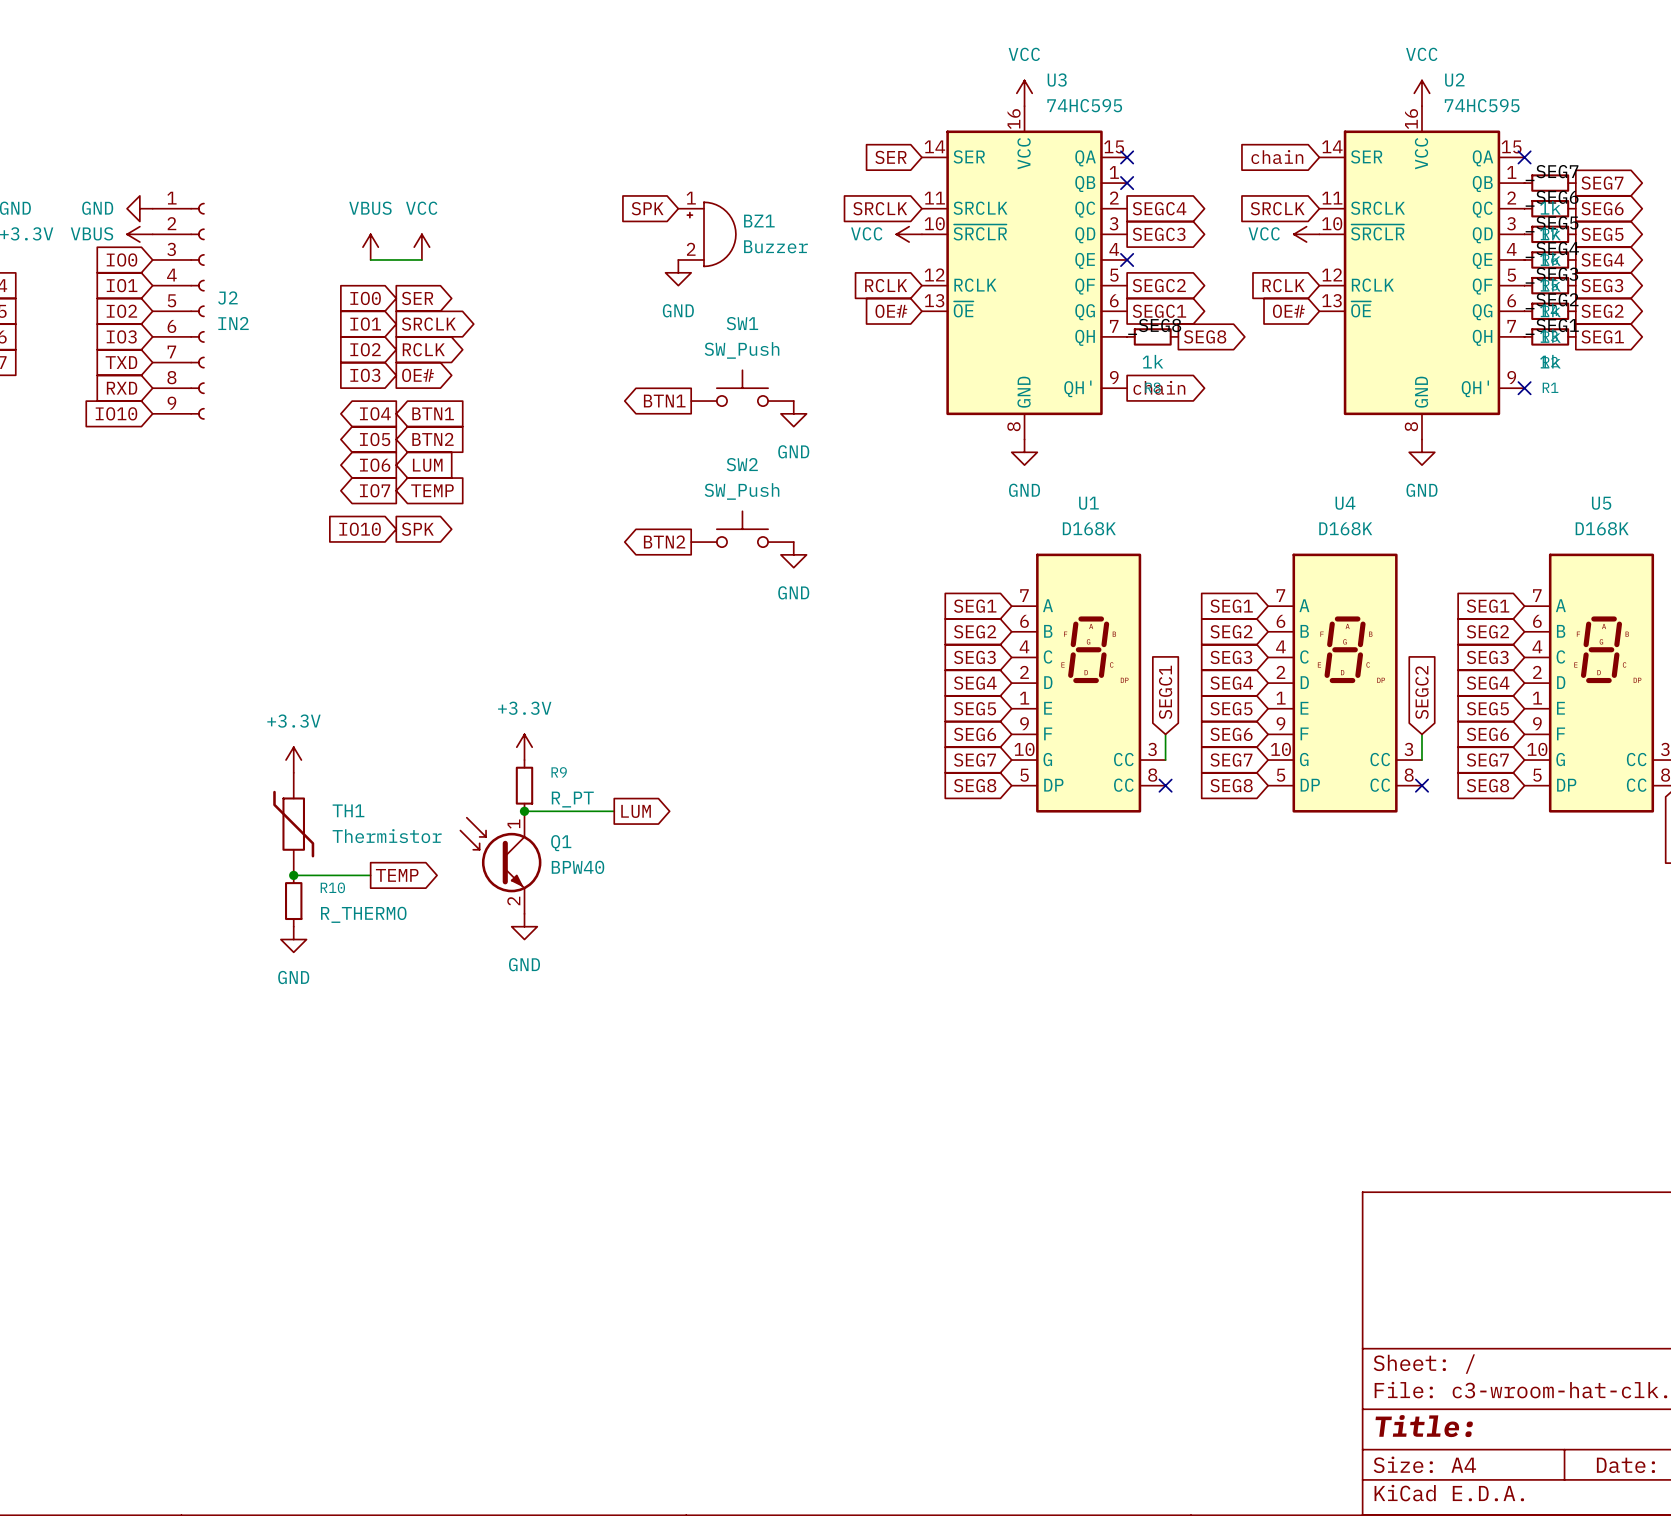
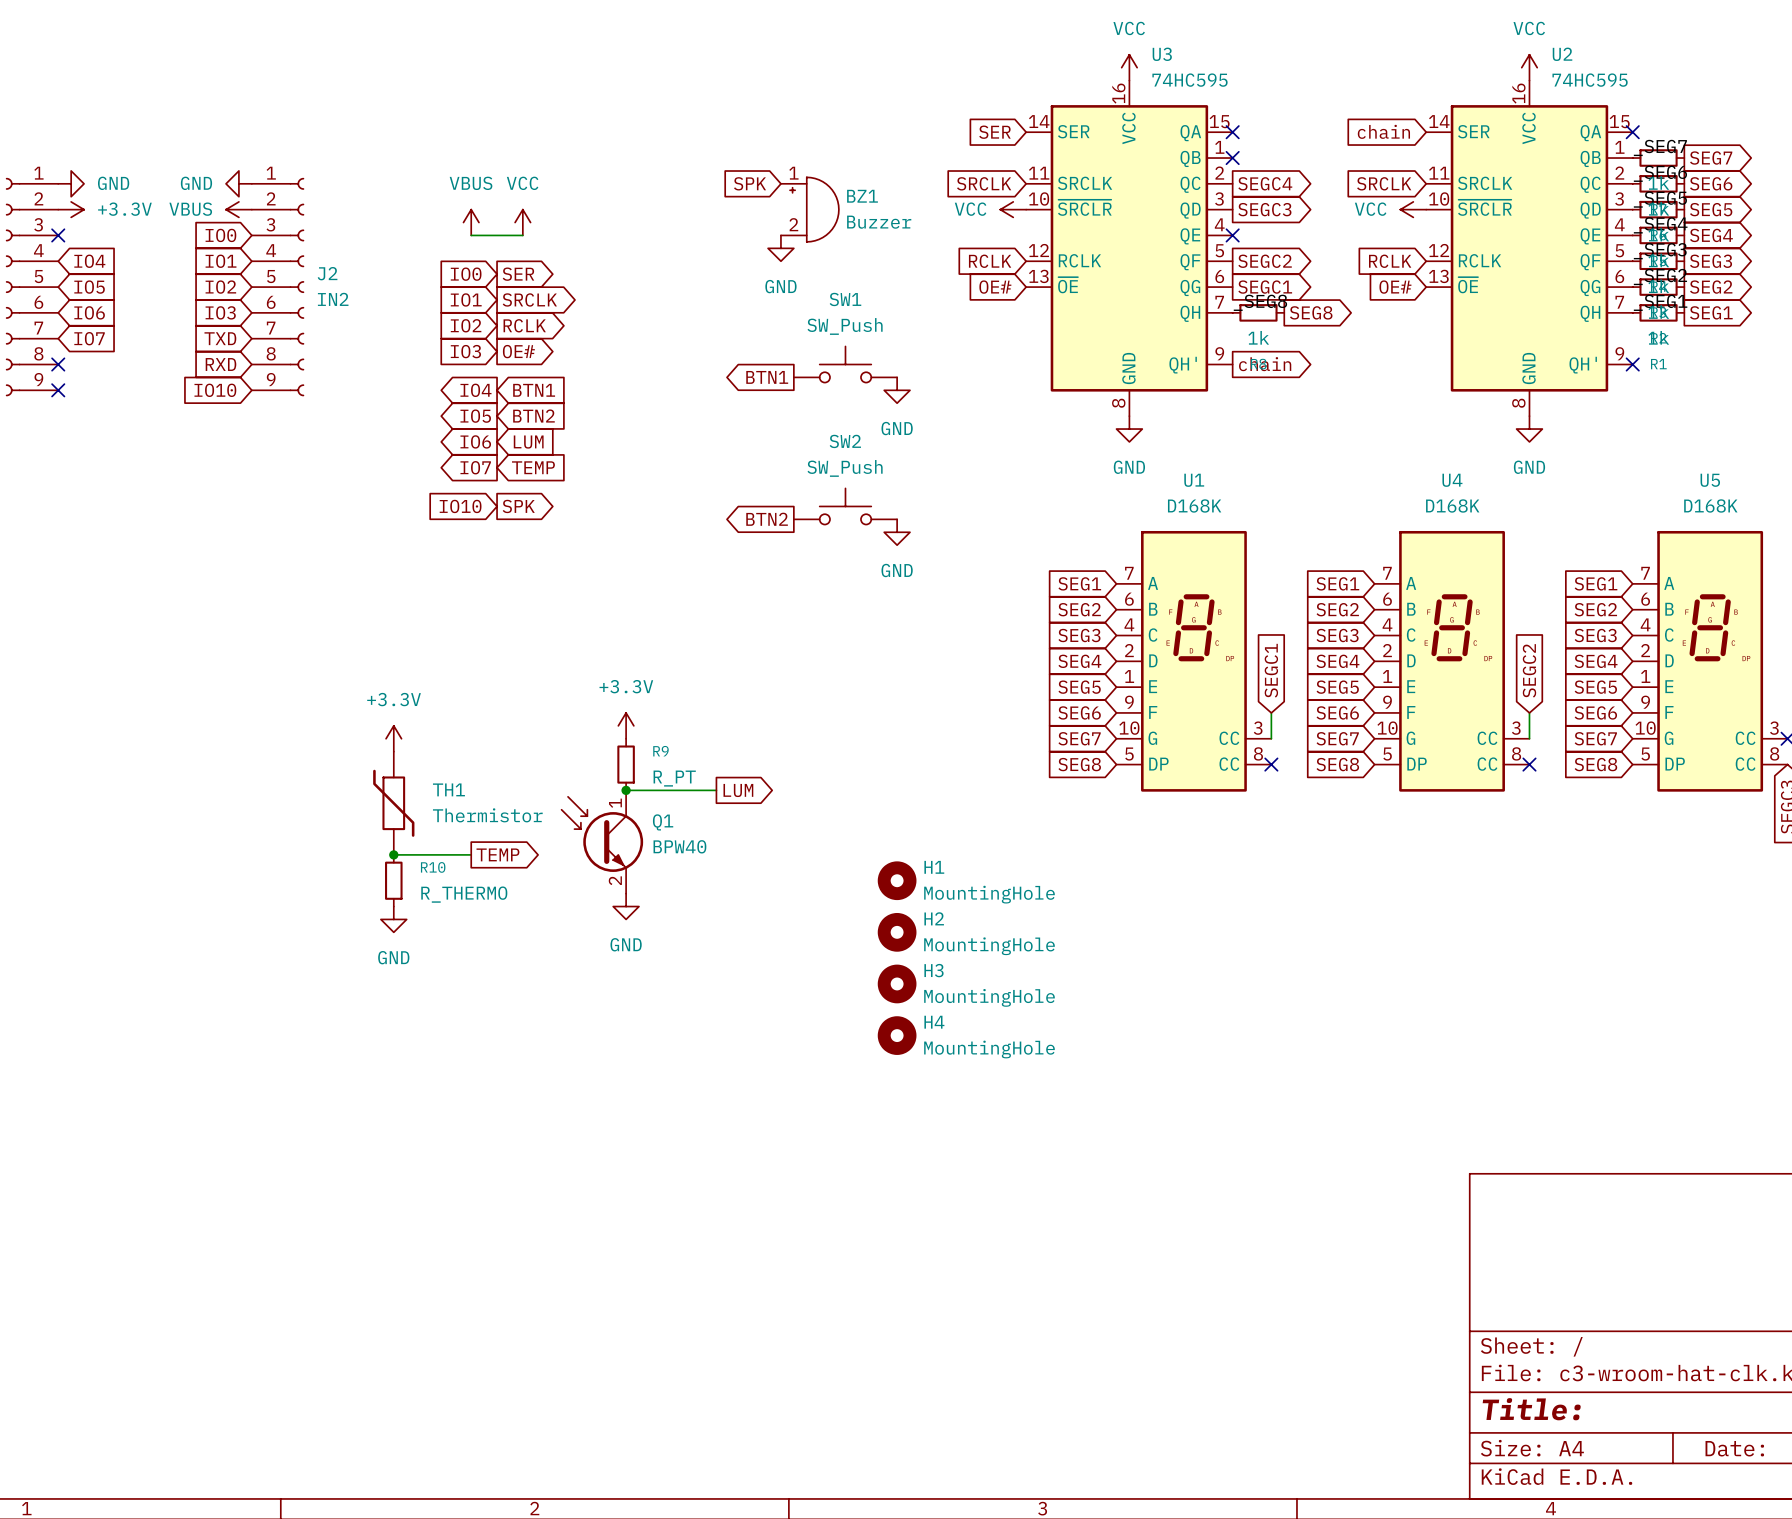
H1: none -> MountingHole (897, 880)
H2: none -> MountingHole (897, 932)
H3: none -> MountingHole (897, 983)
H4: none -> MountingHole (897, 1035)

